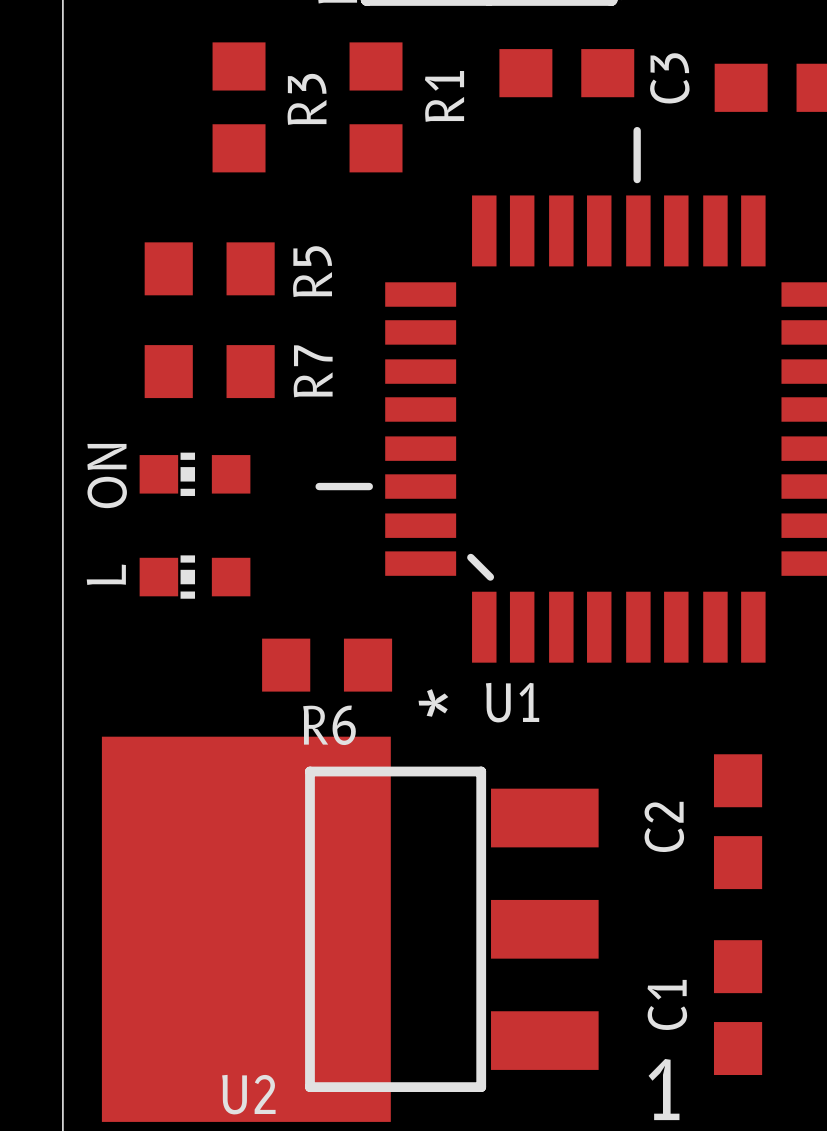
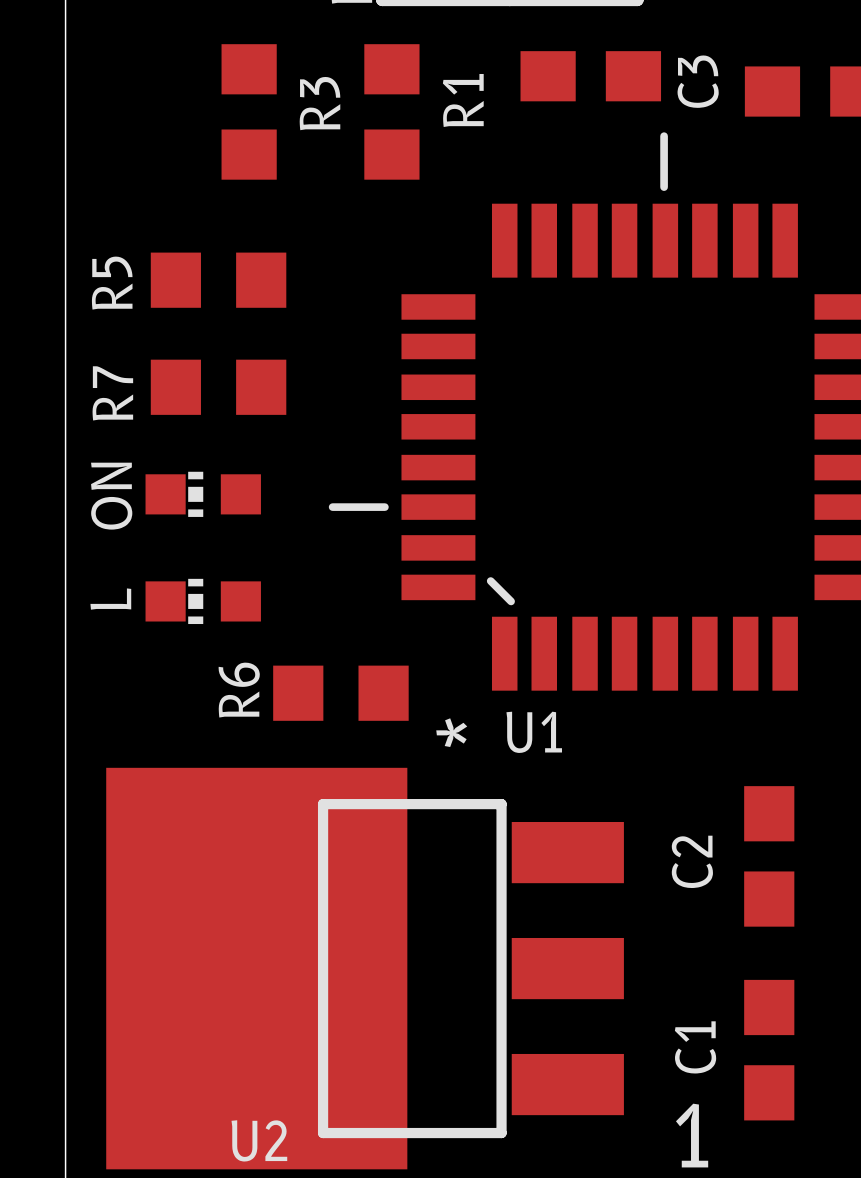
R5 name position: R5 (312, 271) -> R5 (112, 283)
R7 name position: R7 (313, 371) -> R7 (112, 393)
R6 name rotation: 0° (329, 725) -> 90° counterclockwise (239, 690)
R6 name position: R6 (329, 725) -> R6 (239, 690)

